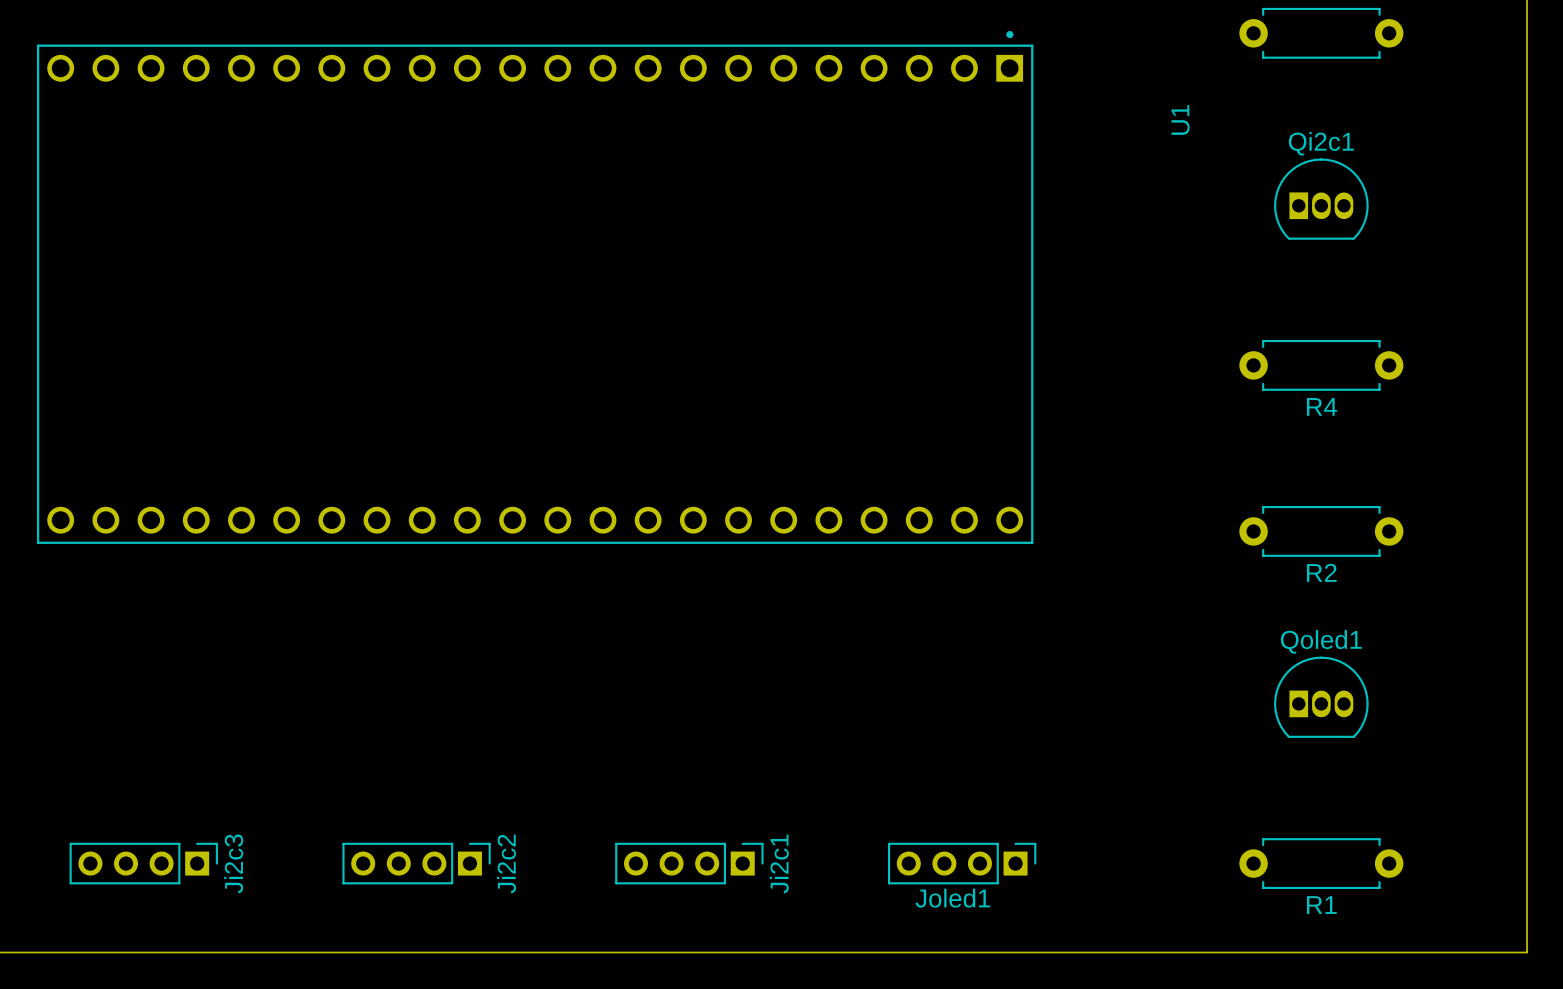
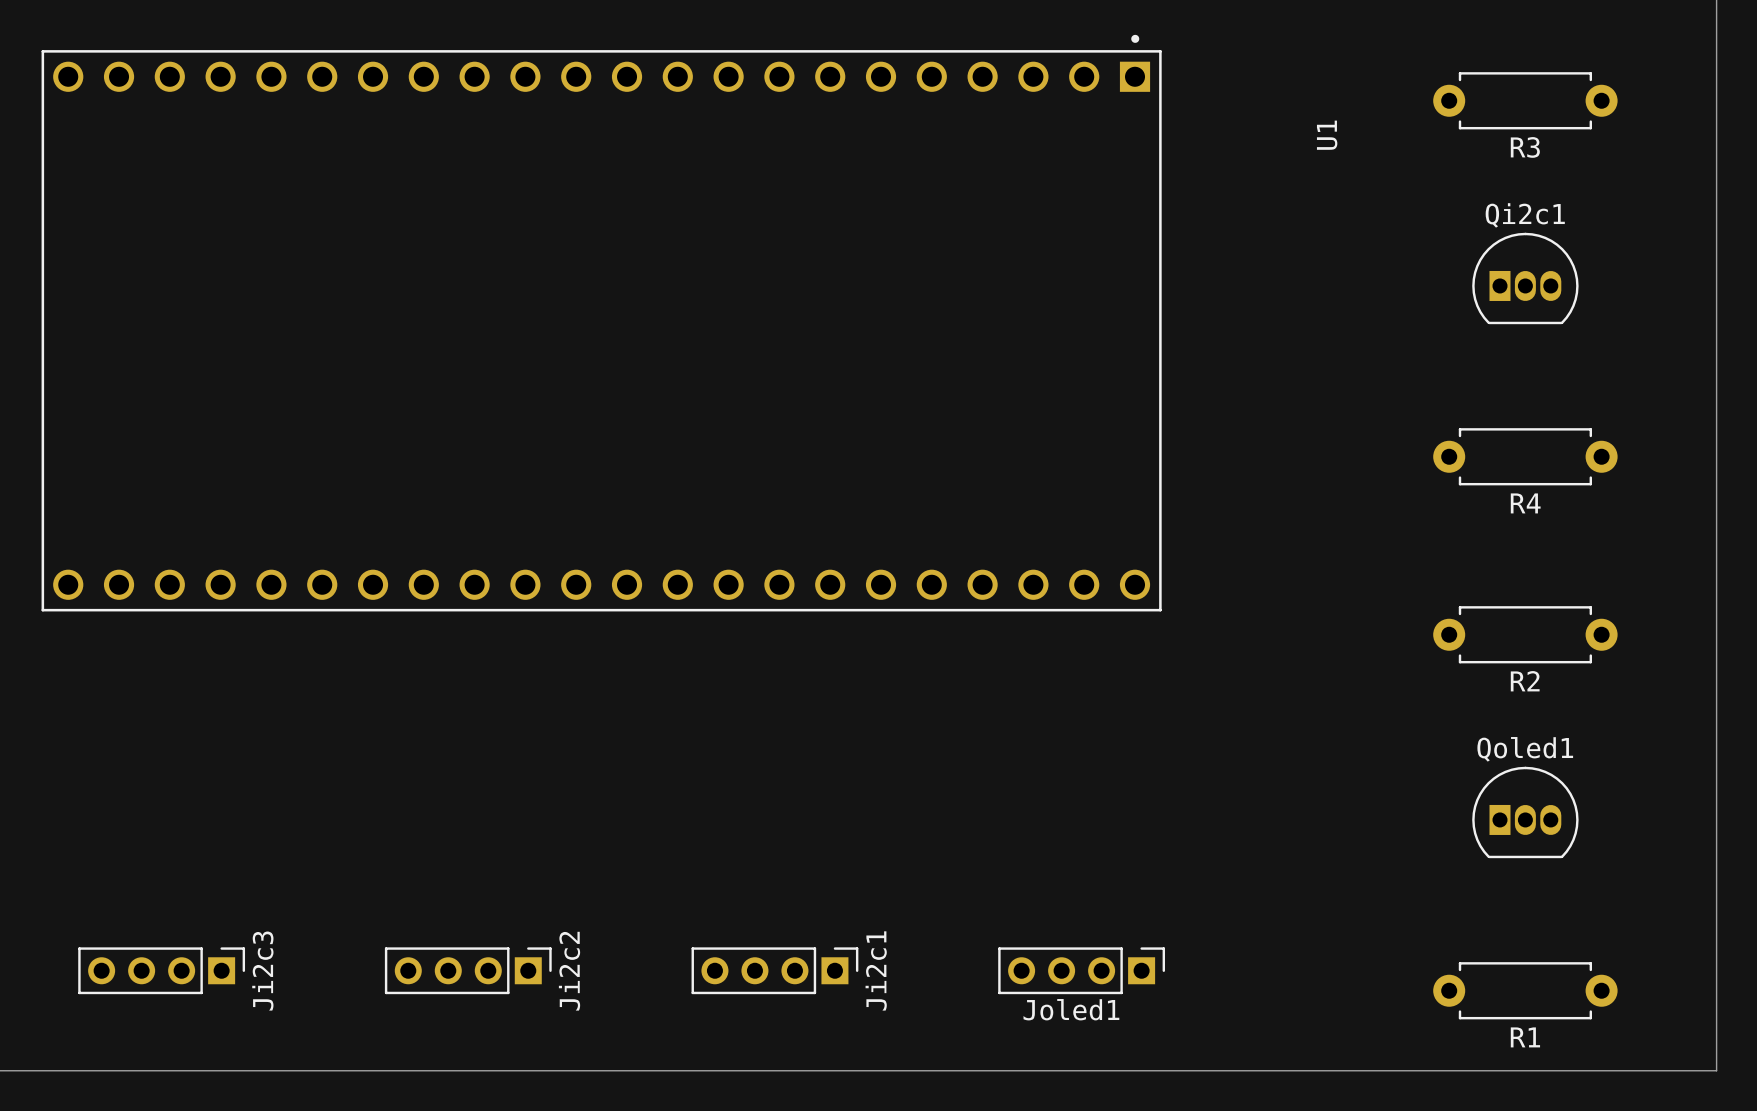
part: (1321, 33) -> none
R3: none -> (1525, 100)
Qi2c1 position: (1321, 199) -> (1525, 278)
R4 position: (1321, 365) -> (1525, 456)
R2 position: (1321, 531) -> (1525, 634)
Qoled1 position: (1321, 697) -> (1525, 812)
R1 position: (1321, 863) -> (1525, 990)

